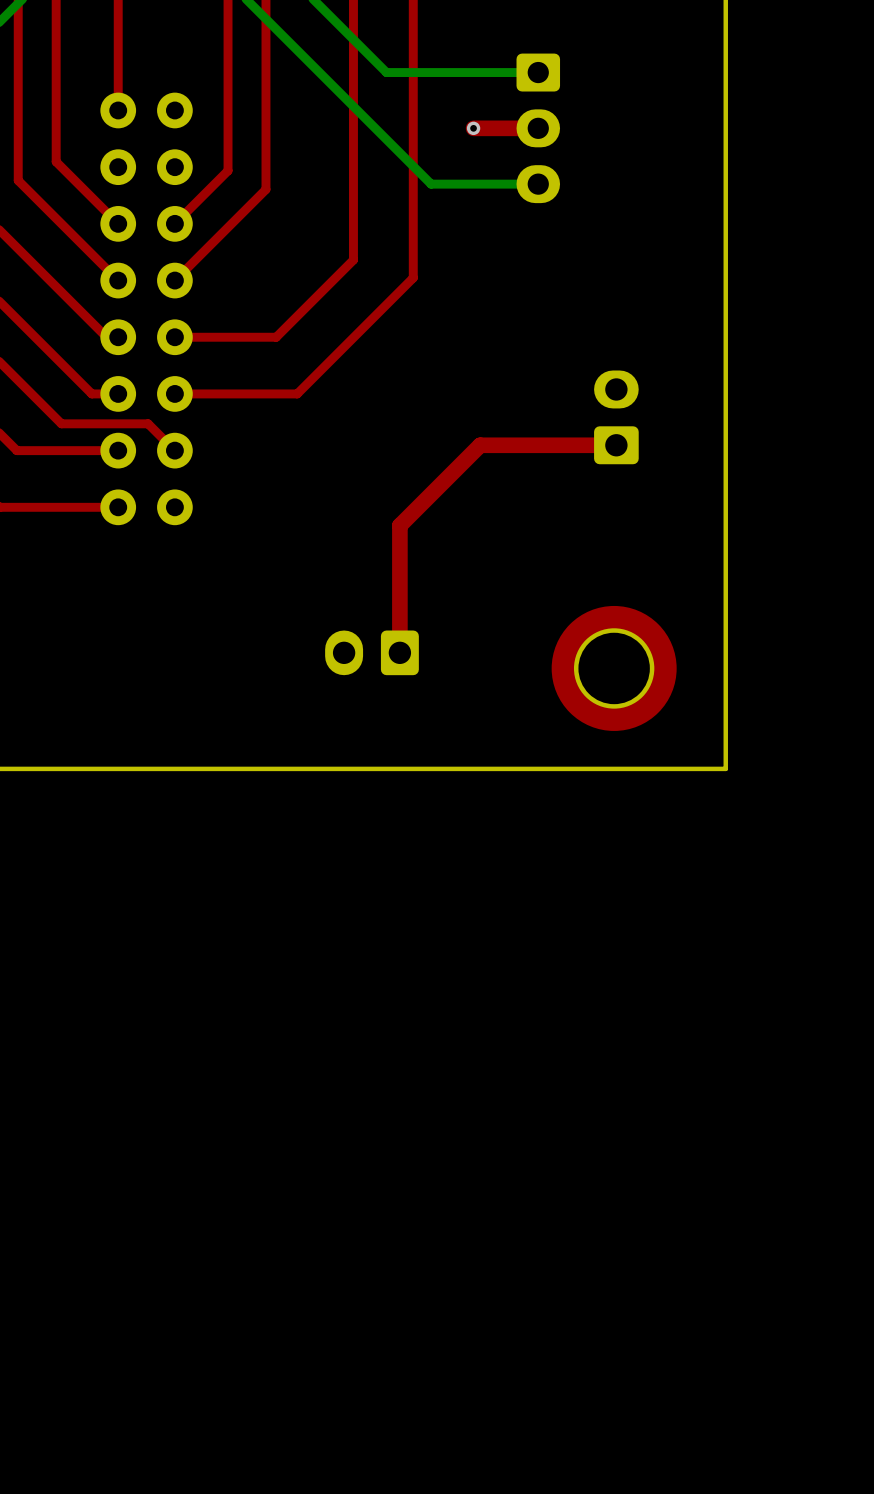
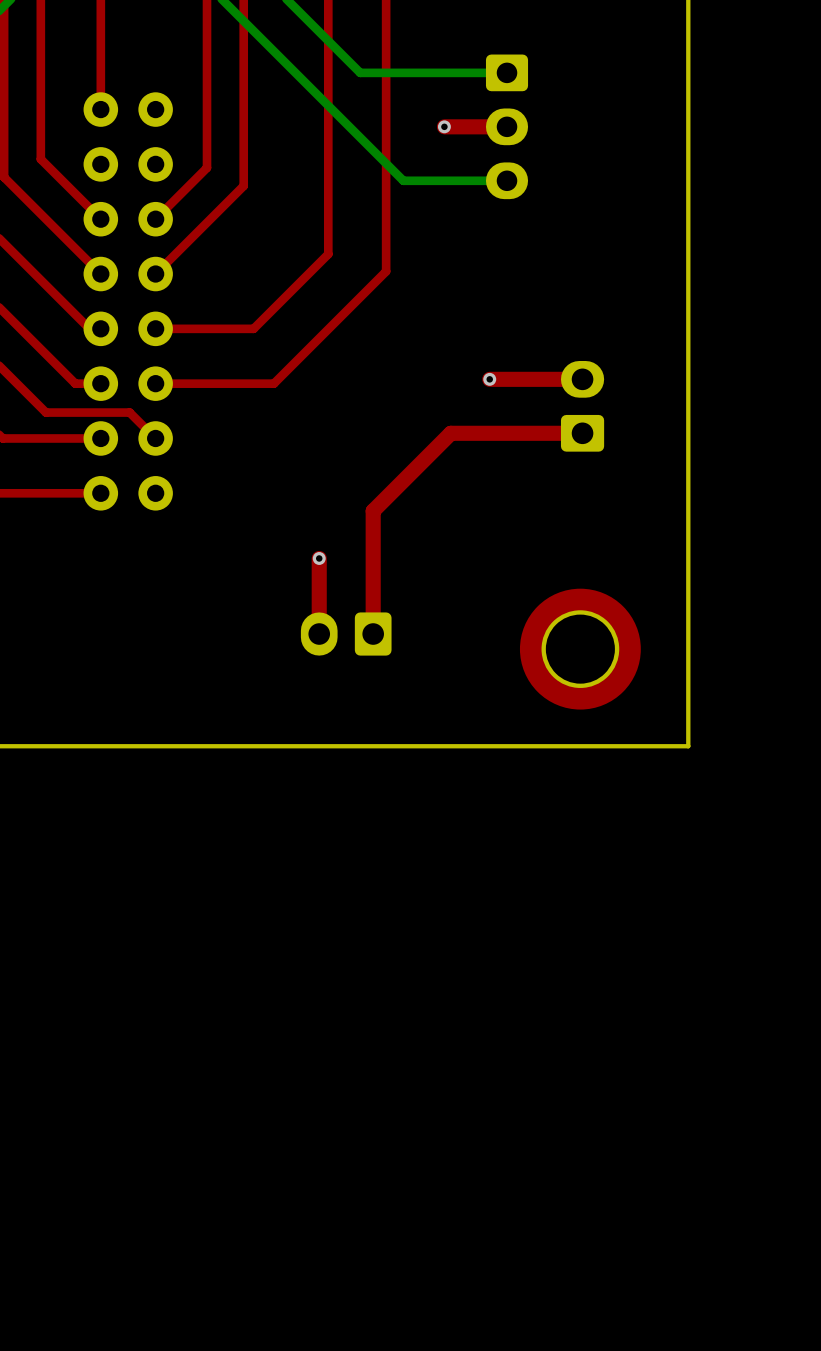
via: none -> (489, 379)
top track: none -> (582, 379) (489, 379)
top track: none -> (319, 558) (319, 634)
via: none -> (319, 558)

